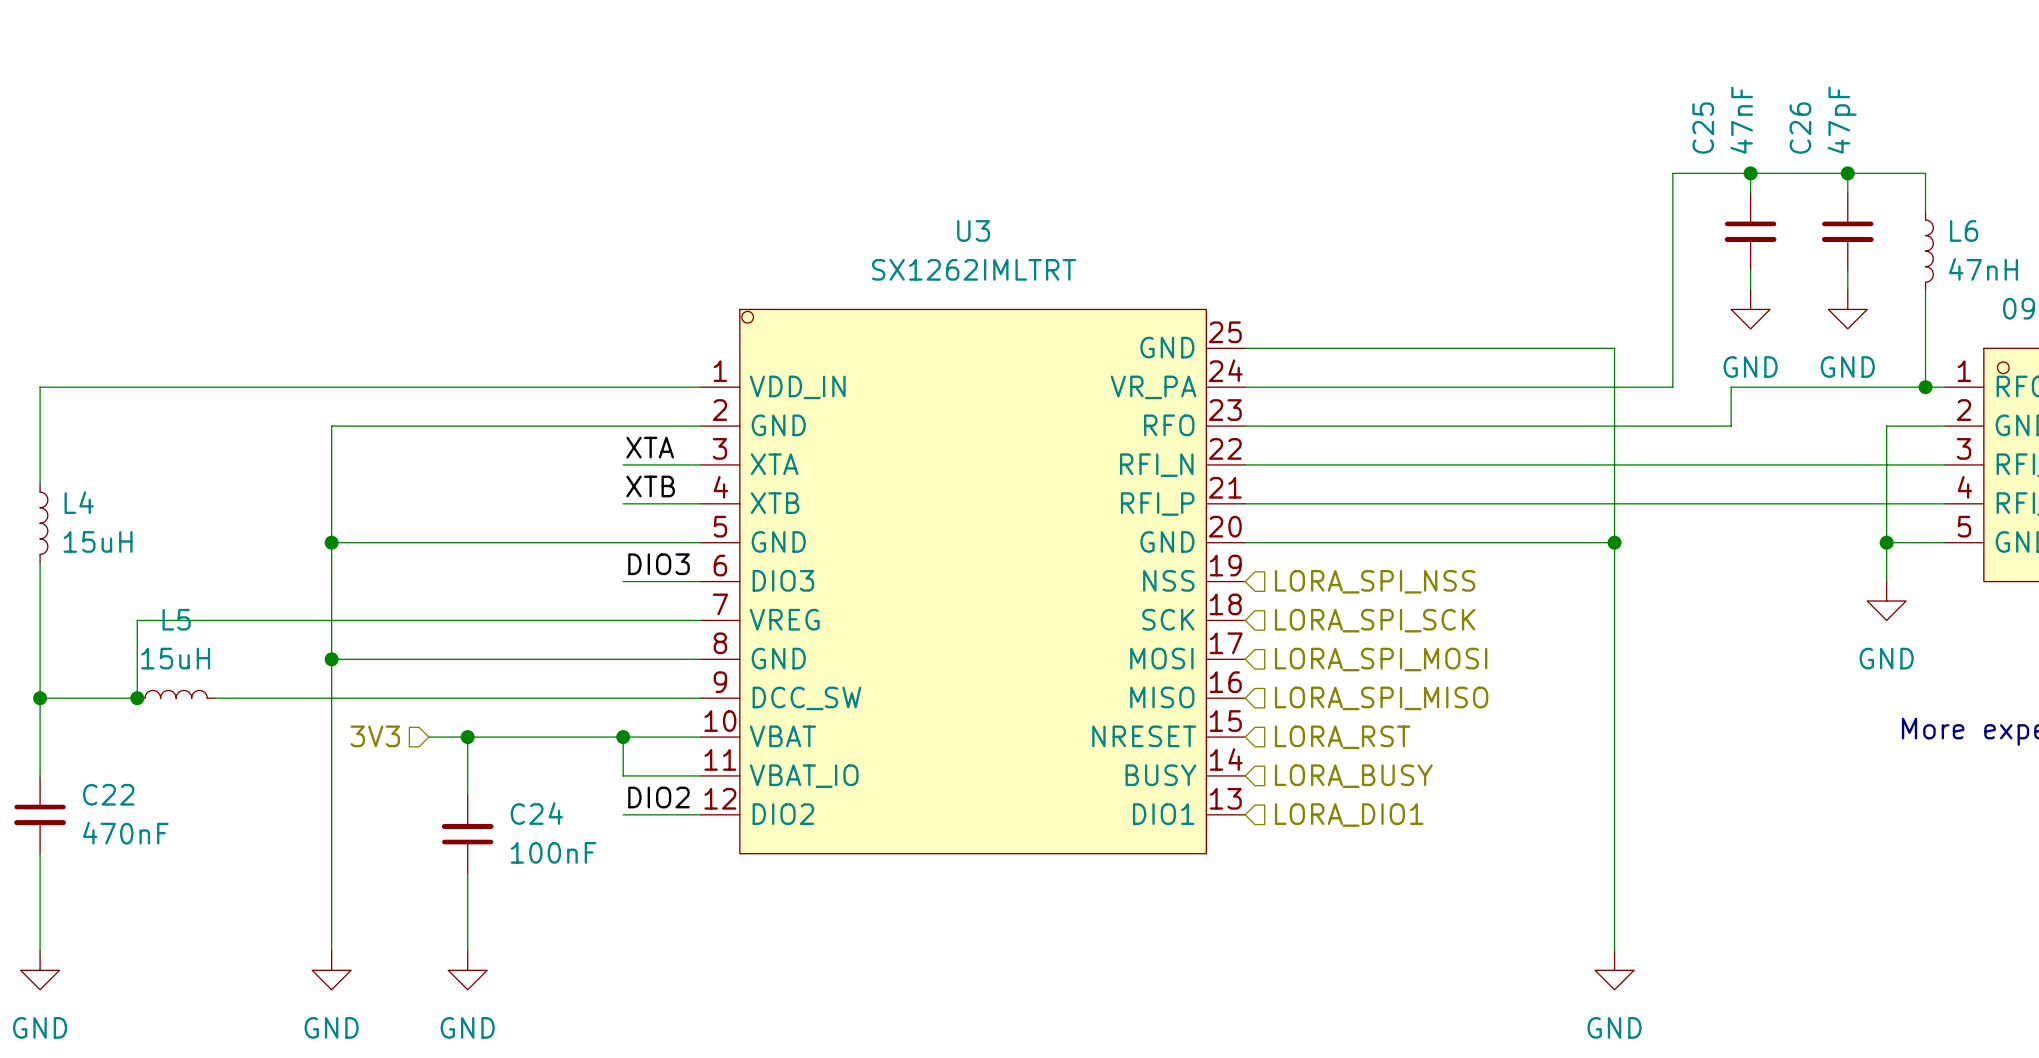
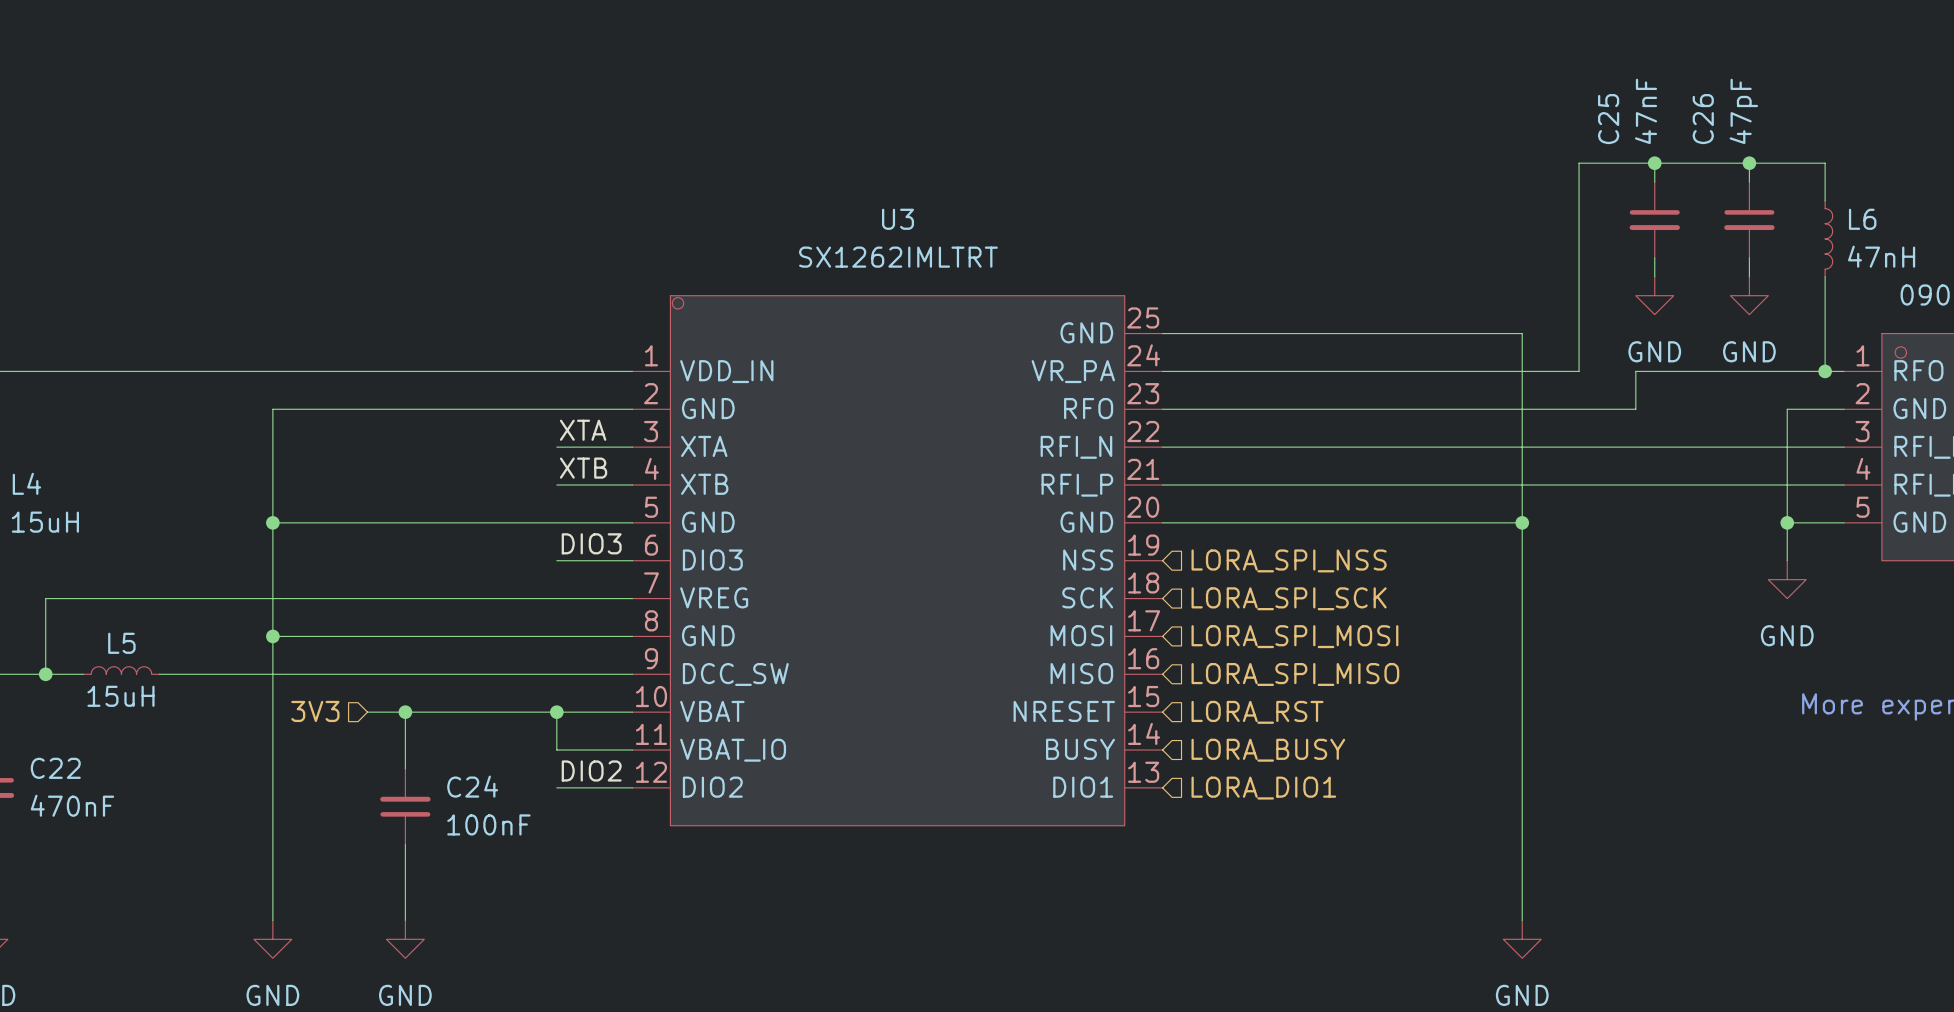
L5 name position: L5 (176, 619) -> L5 (121, 643)
wire: (137, 620) (137, 698) -> (83, 598) (45, 598) (45, 674)
L5 value position: 15uH (175, 658) -> 15uH (120, 696)
junction position: (137, 698) -> (45, 674)

